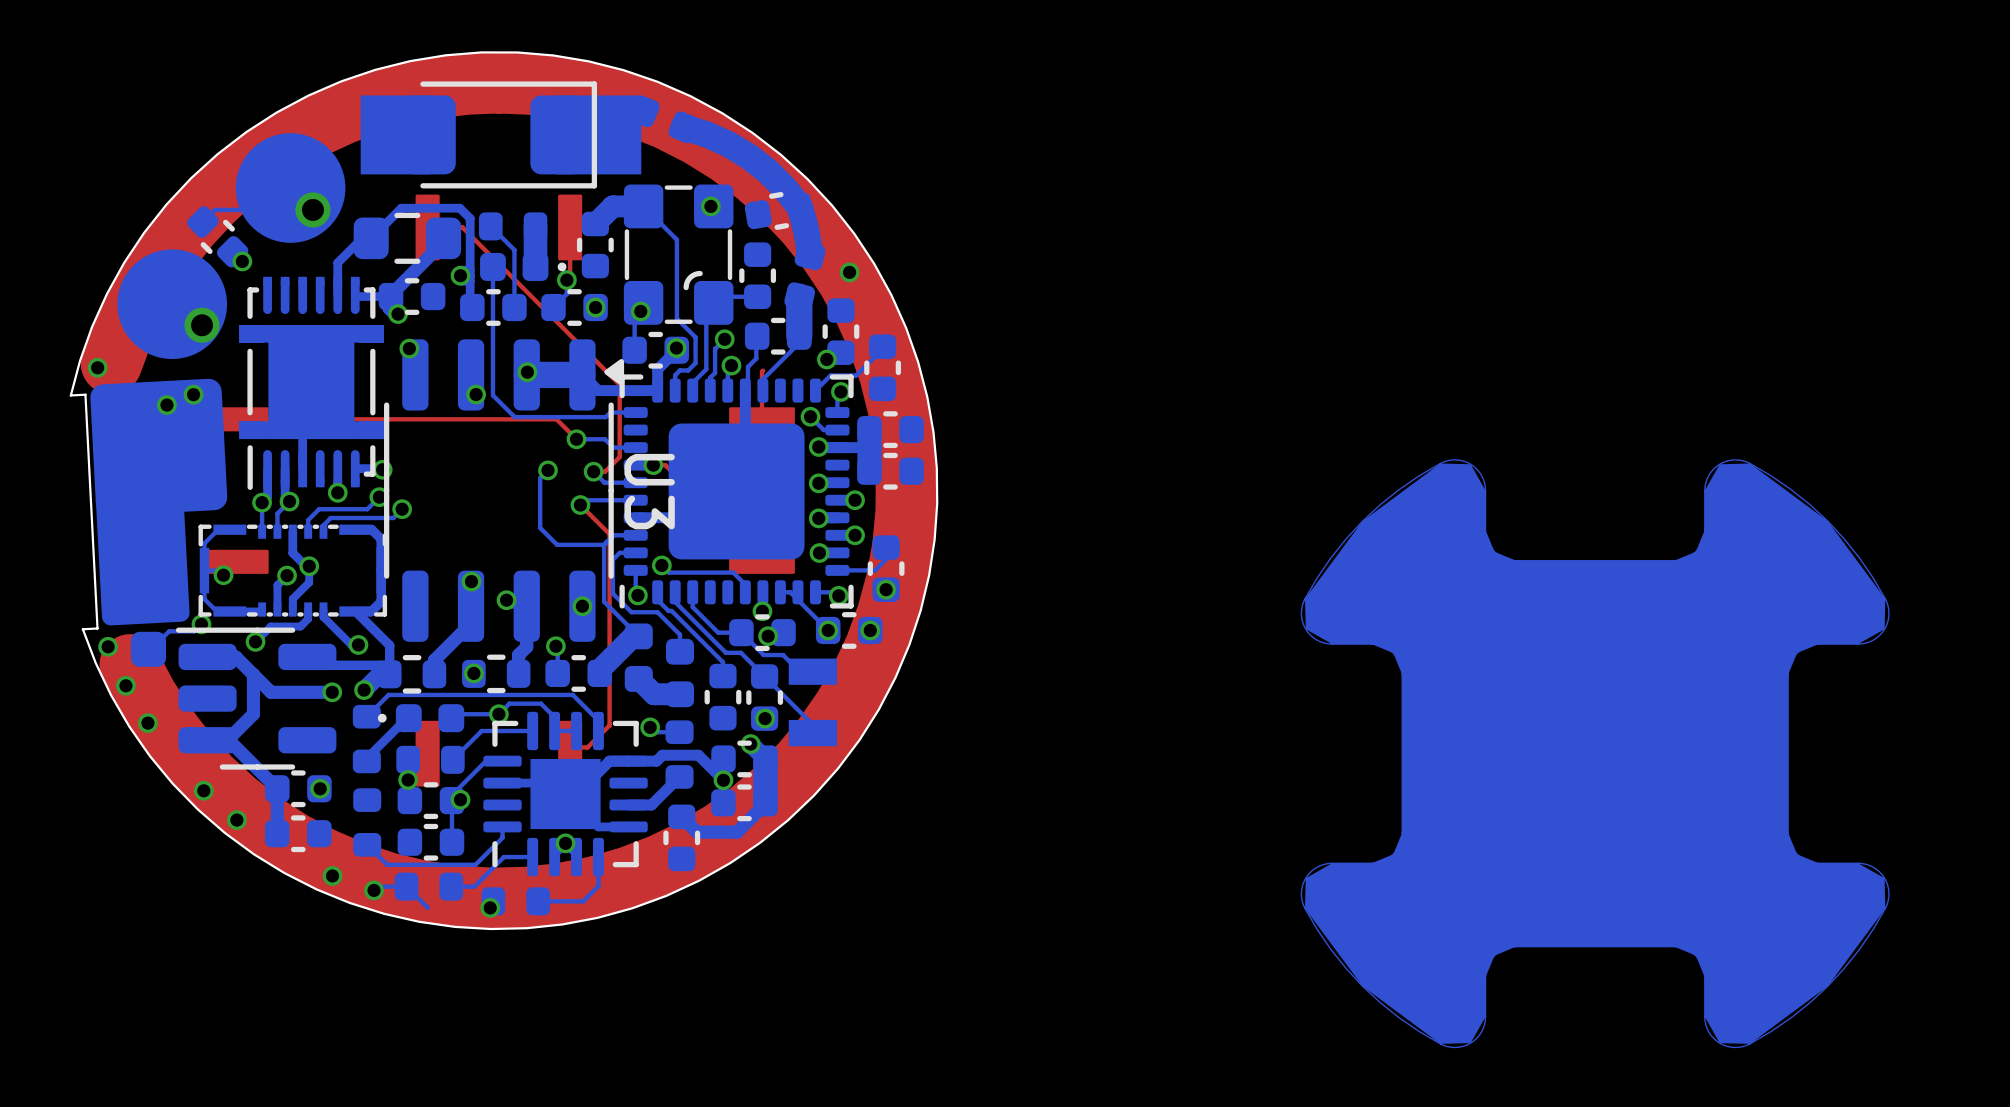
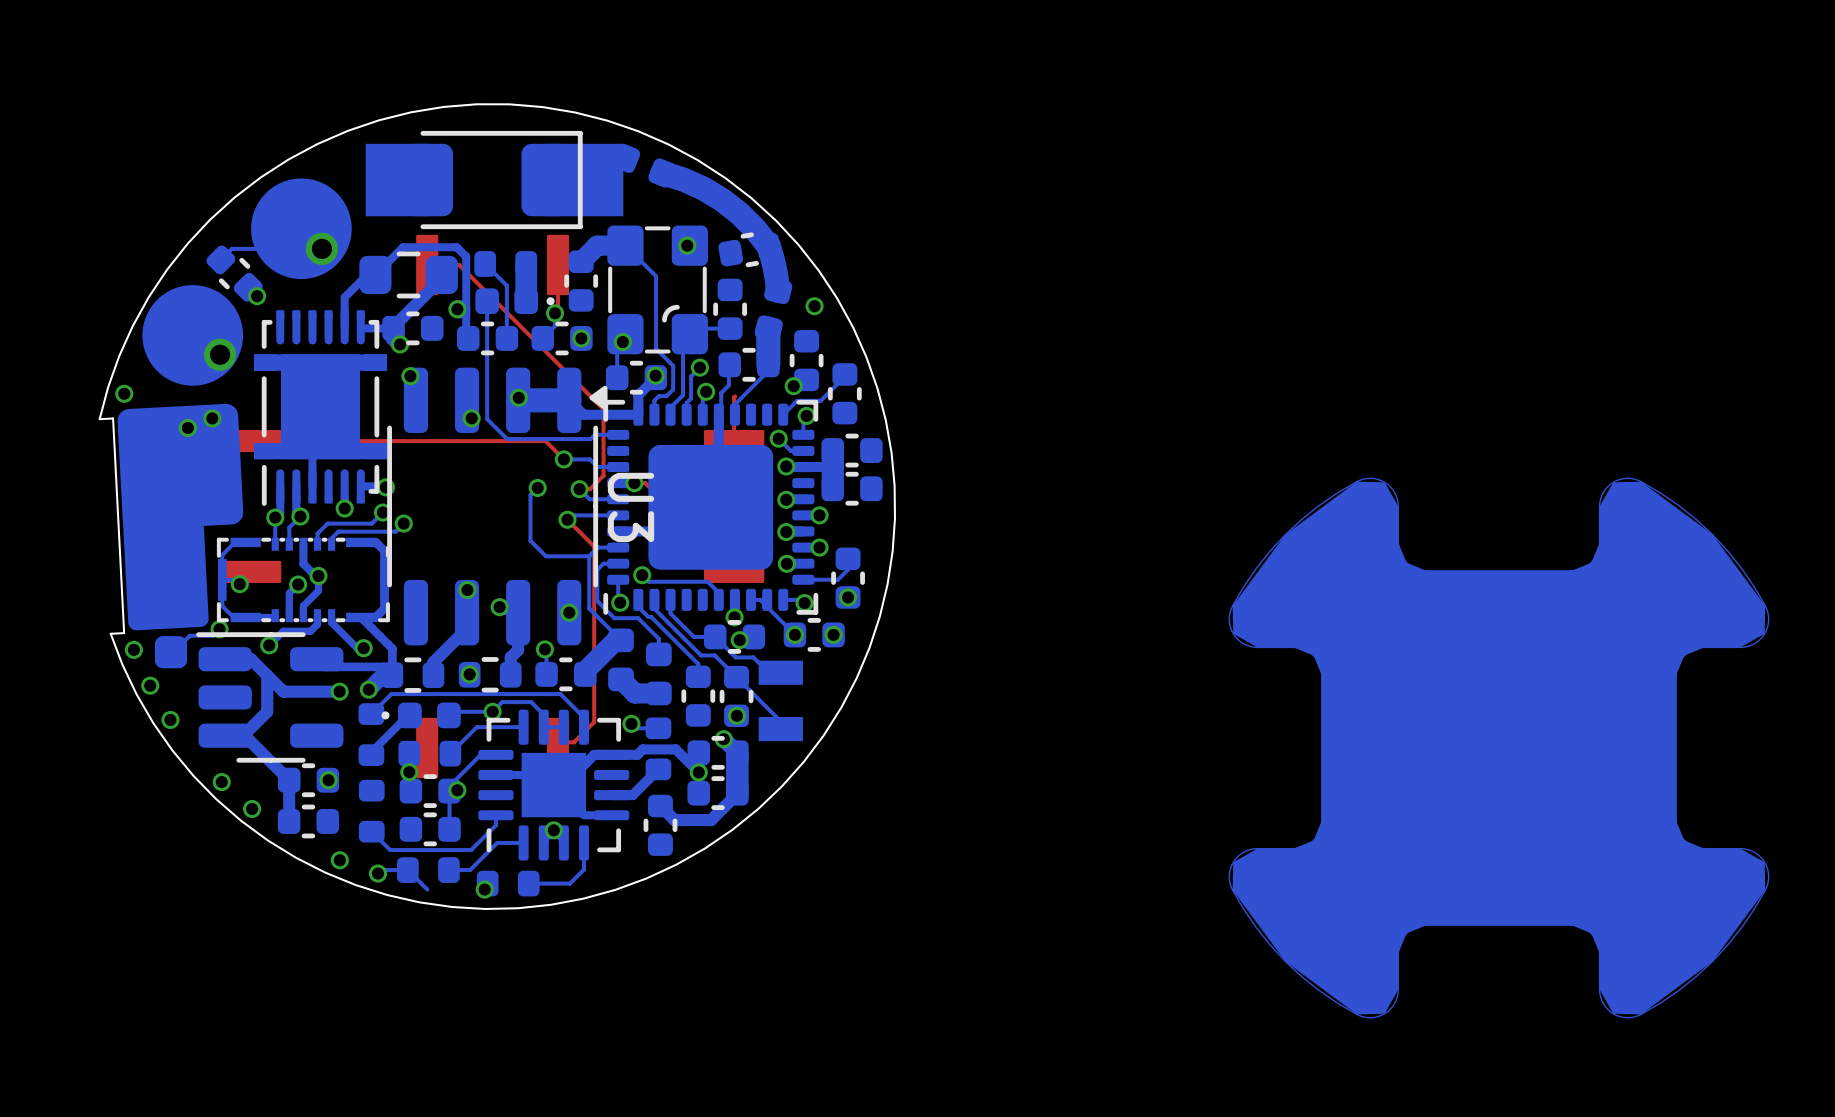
top track: (111, 363) (135, 304) (169, 250) (189, 225) (234, 180) (286, 142) (343, 113) (373, 102) (435, 87) (498, 82) (568, 88) (635, 106) (698, 135) (756, 174) (806, 222) (847, 278) (878, 341) (898, 407) (906, 477) (902, 546) (887, 614) (860, 678) (823, 737) (776, 789) (722, 831) (660, 864) (594, 886) (525, 897) (456, 896) (388, 883) (322, 858) (262, 823) (209, 778) (165, 724) (130, 664) -> none

